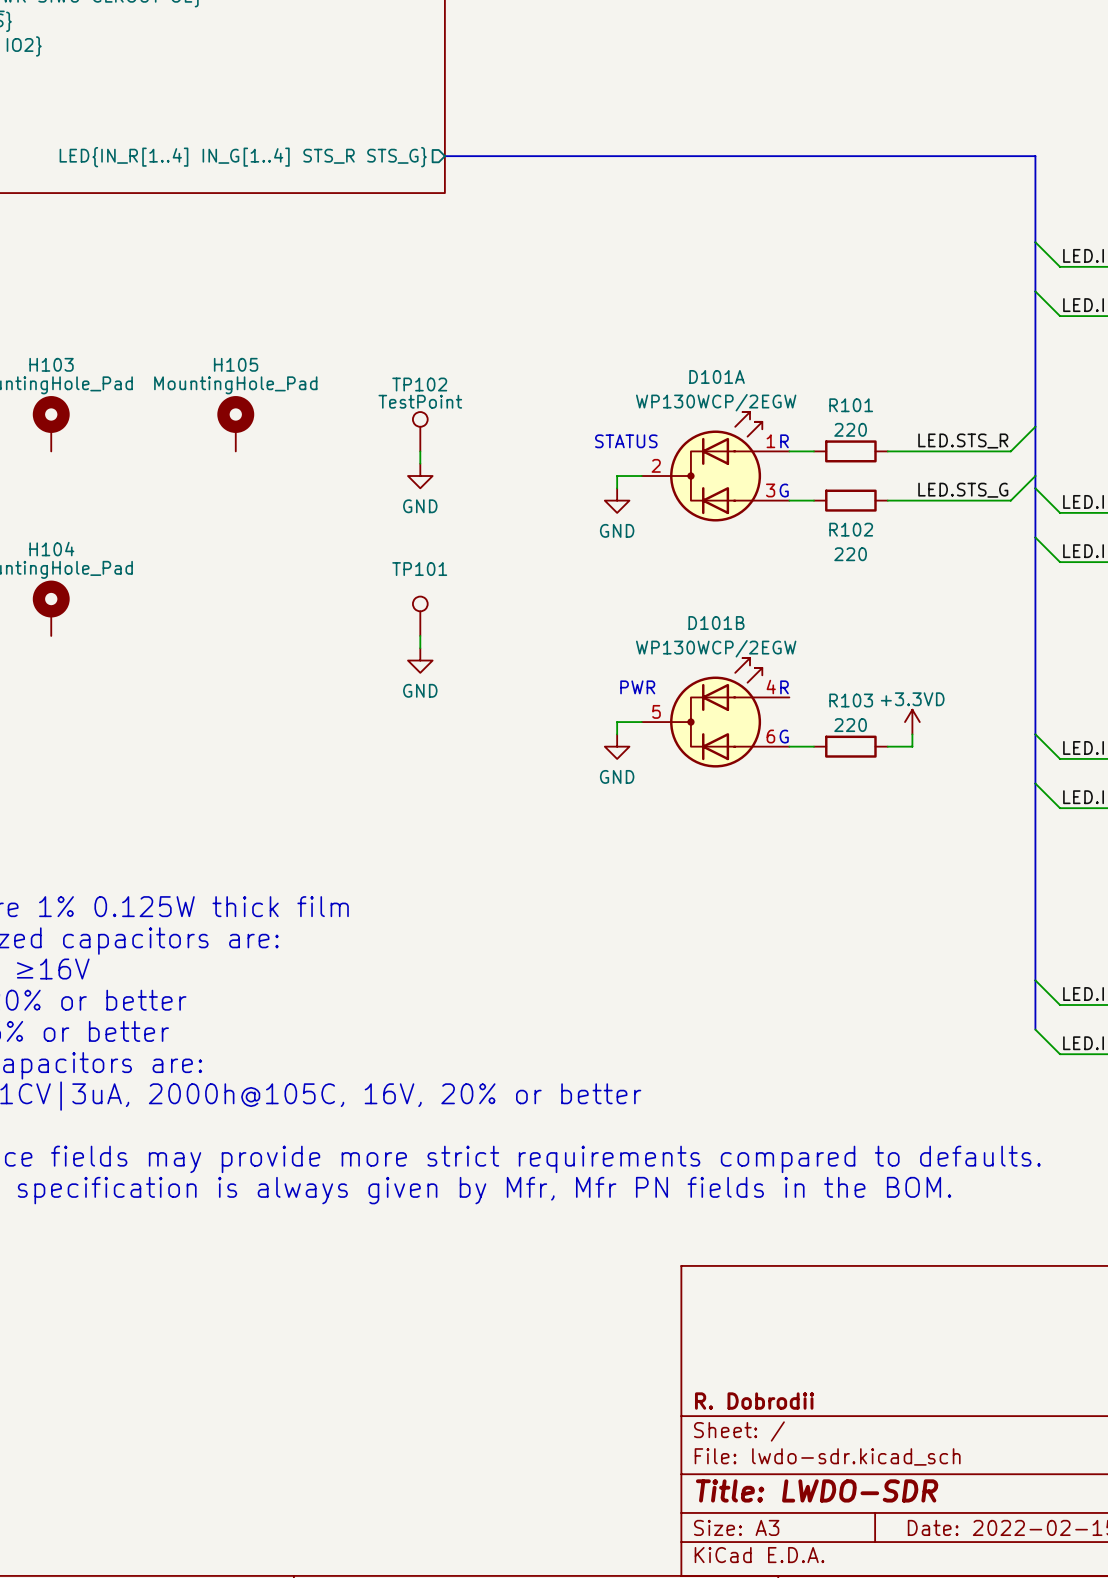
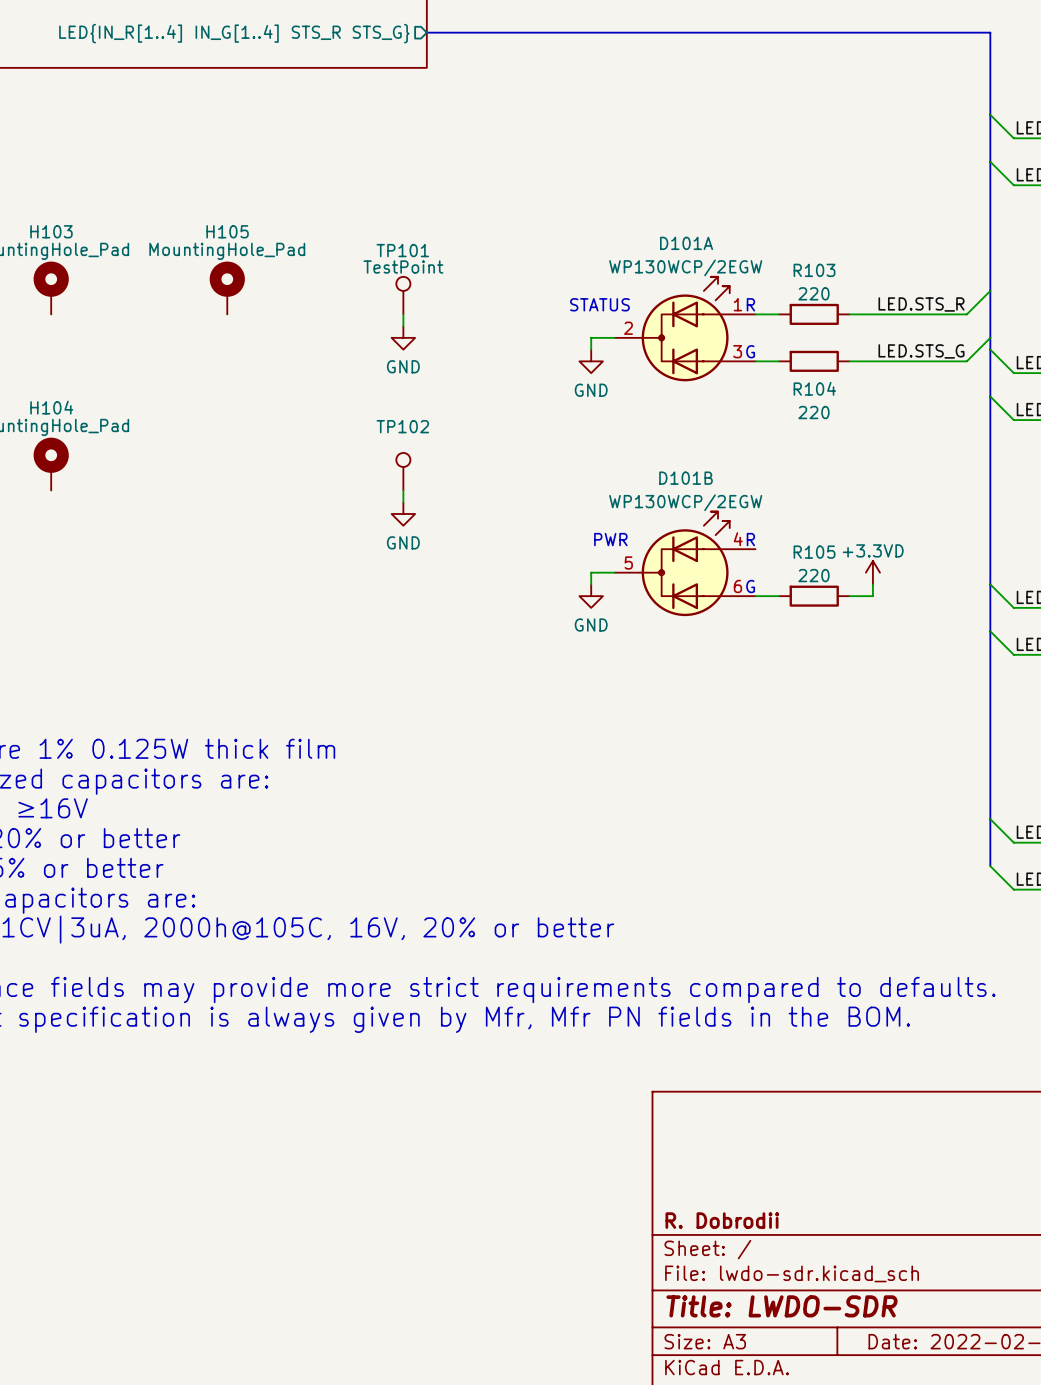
TP102 name: TP102 (419, 384) -> TP101 (402, 250)
R101 name: R101 (851, 405) -> R103 (814, 270)
R102 name: R102 (851, 529) -> R104 (814, 388)
TP101 name: TP101 (419, 569) -> TP102 (402, 426)
R103 name: R103 (851, 700) -> R105 (814, 552)

